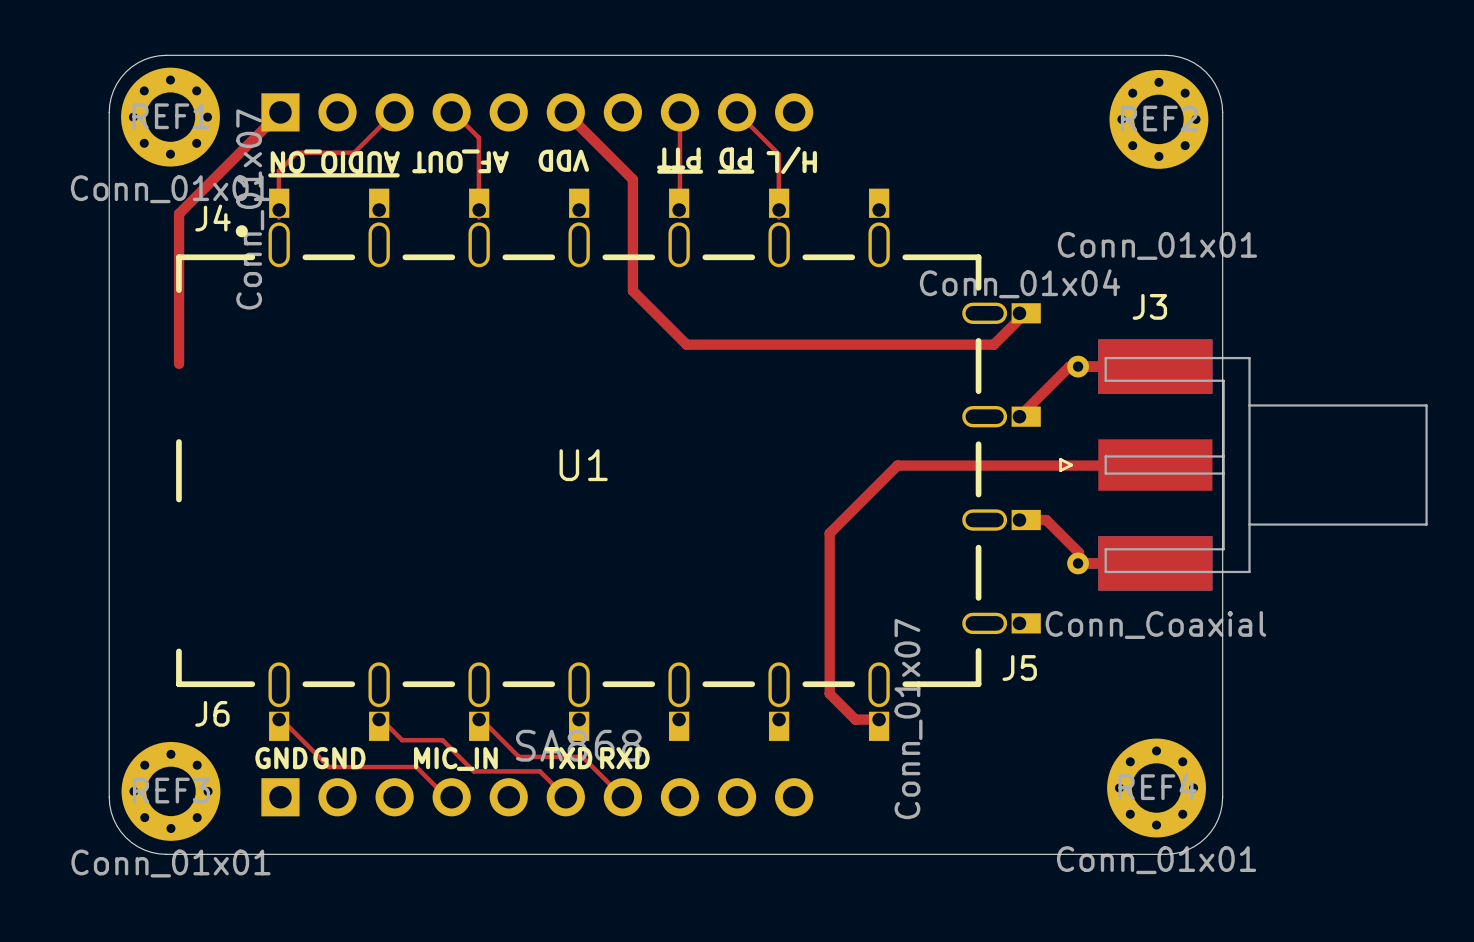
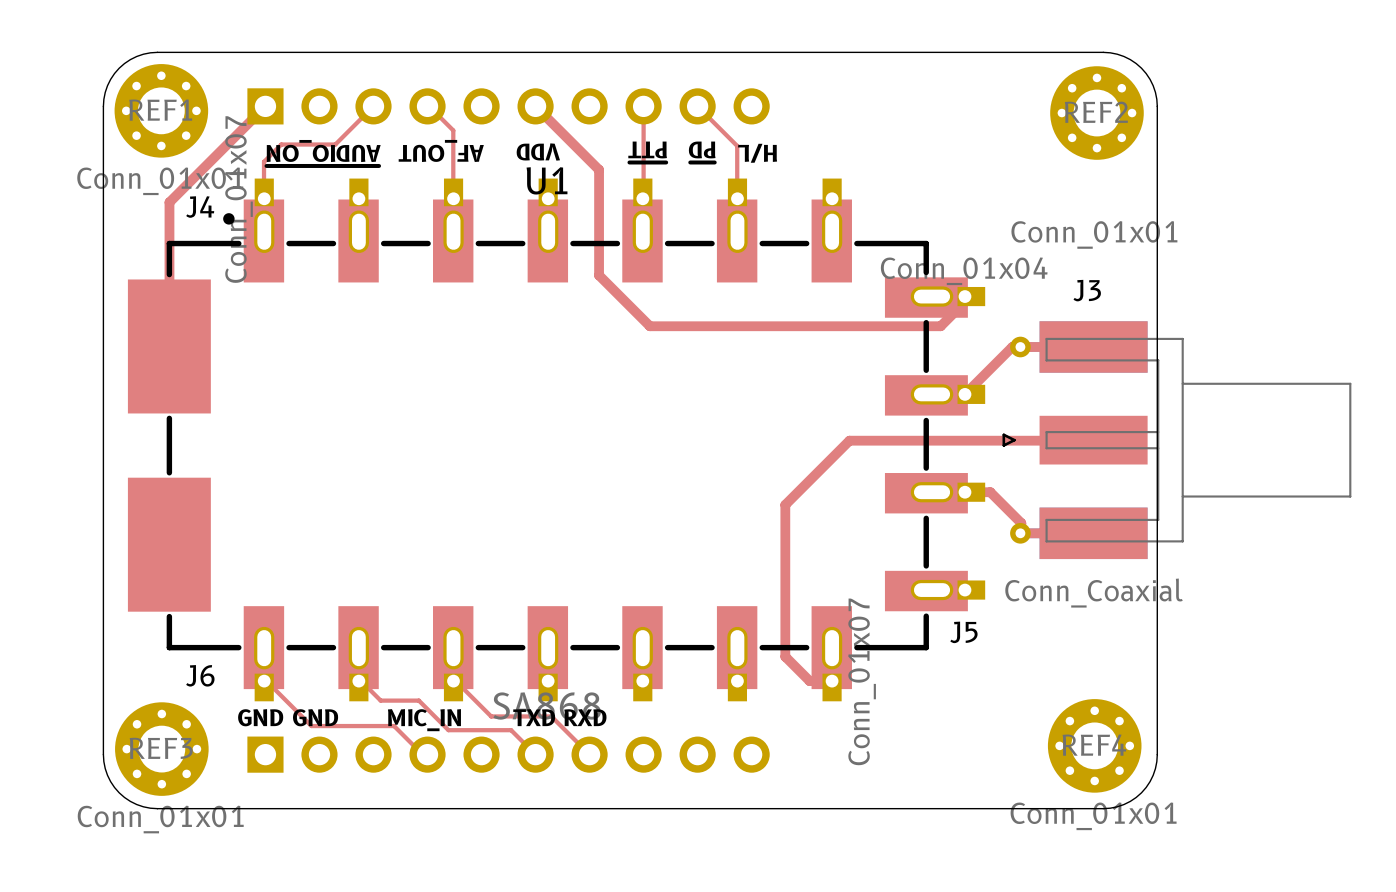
U1 footprint: [176, 225, 982, 688] -> [127, 199, 968, 690]
U1 name position: U1 (583, 465) -> U1 (547, 180)

